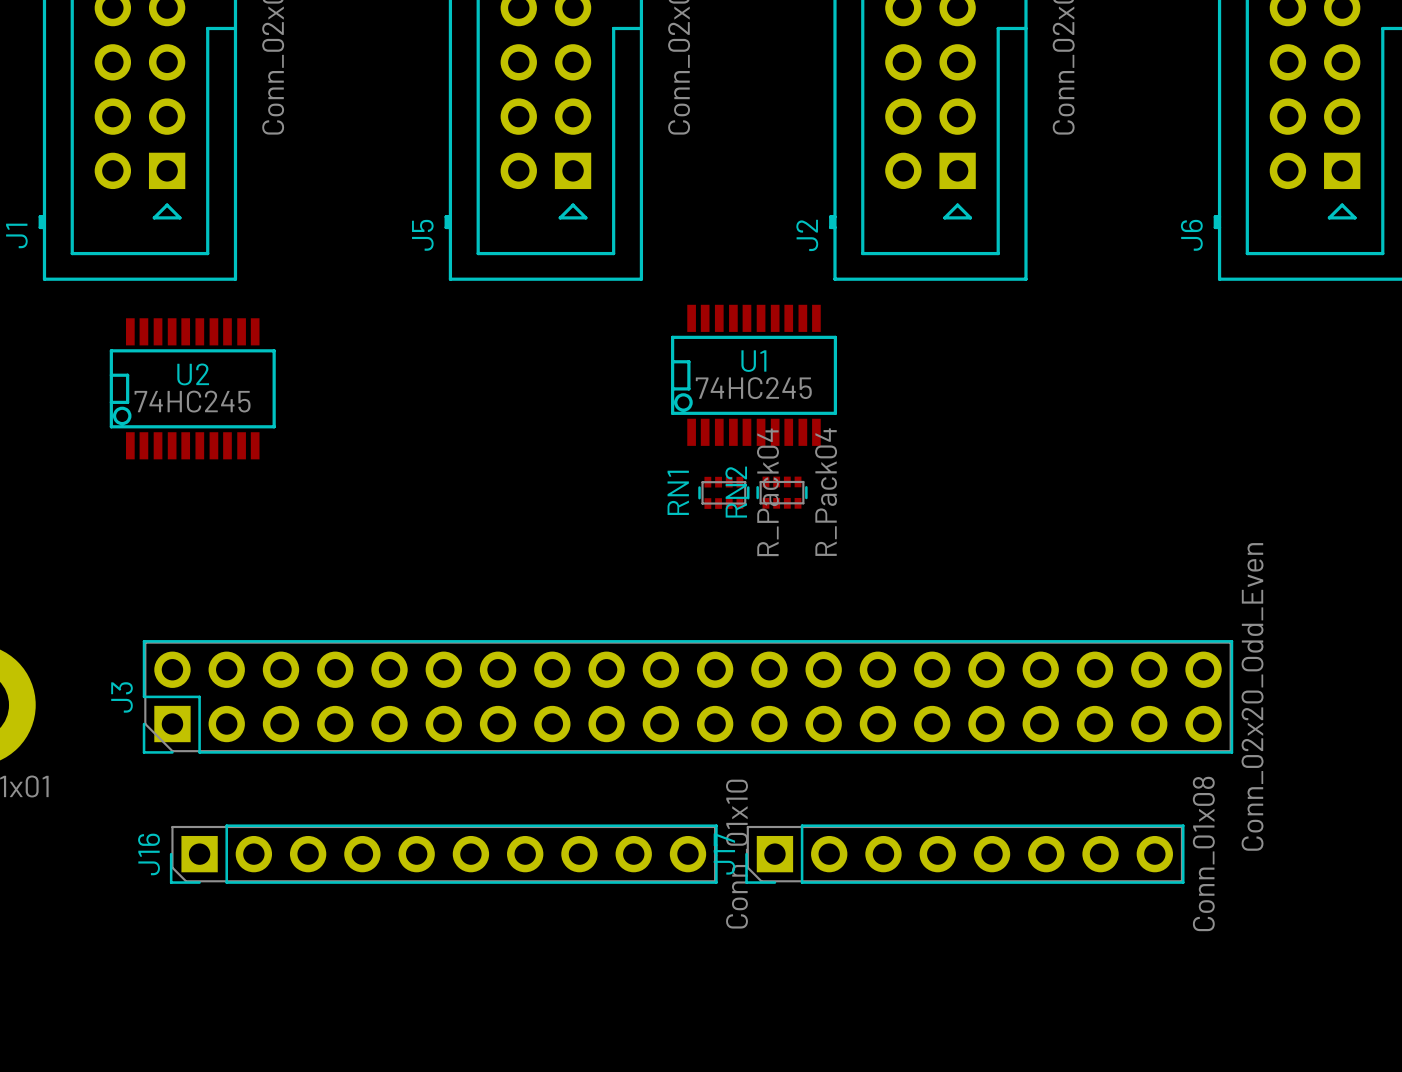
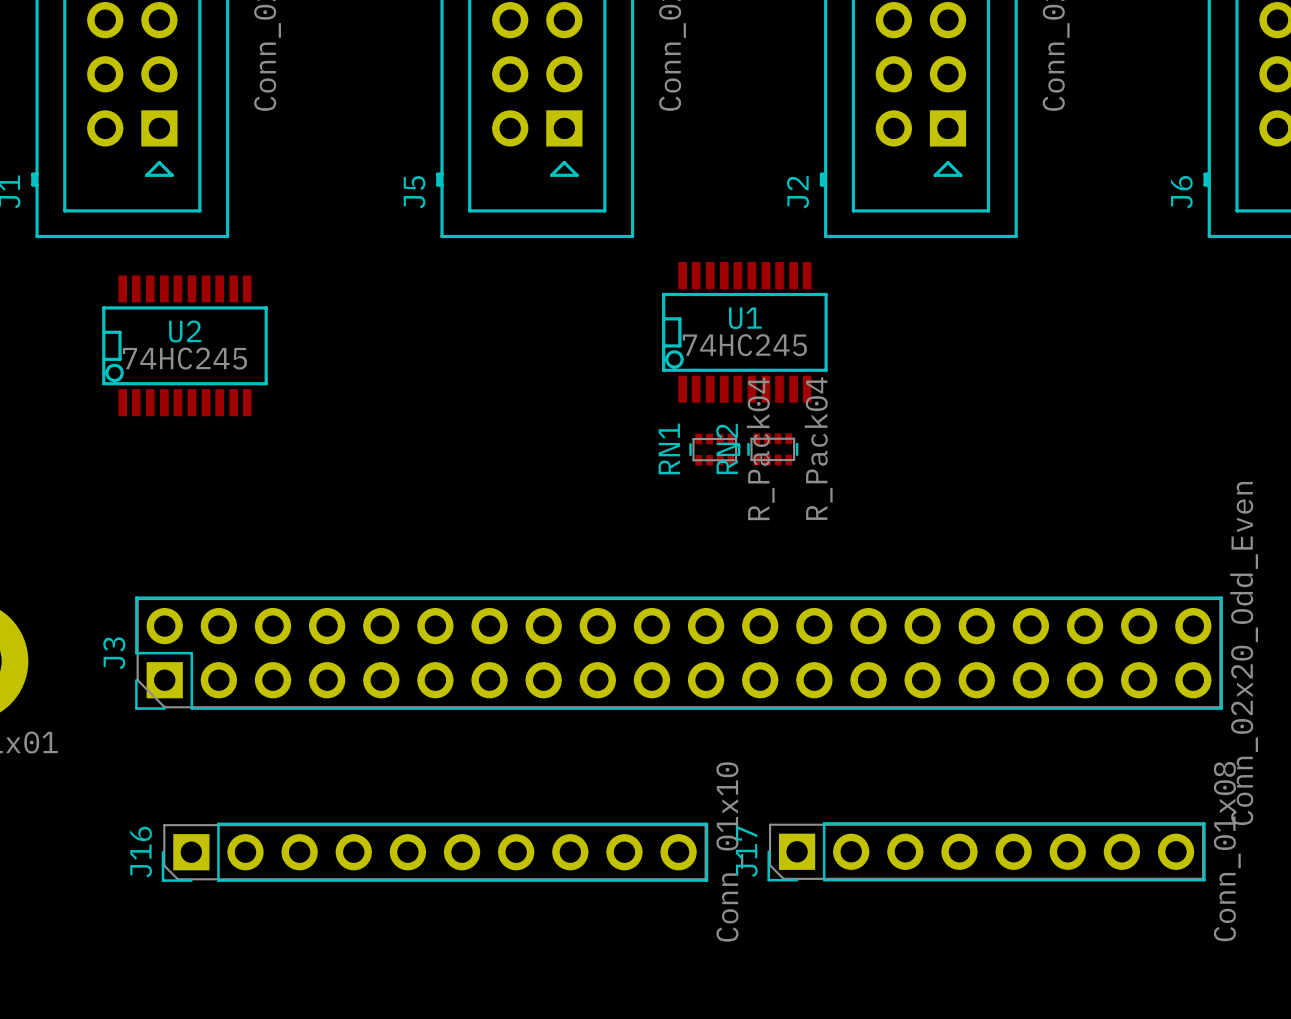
J16 position: (443, 854) -> (434, 852)
J17 position: (964, 854) -> (986, 851)

